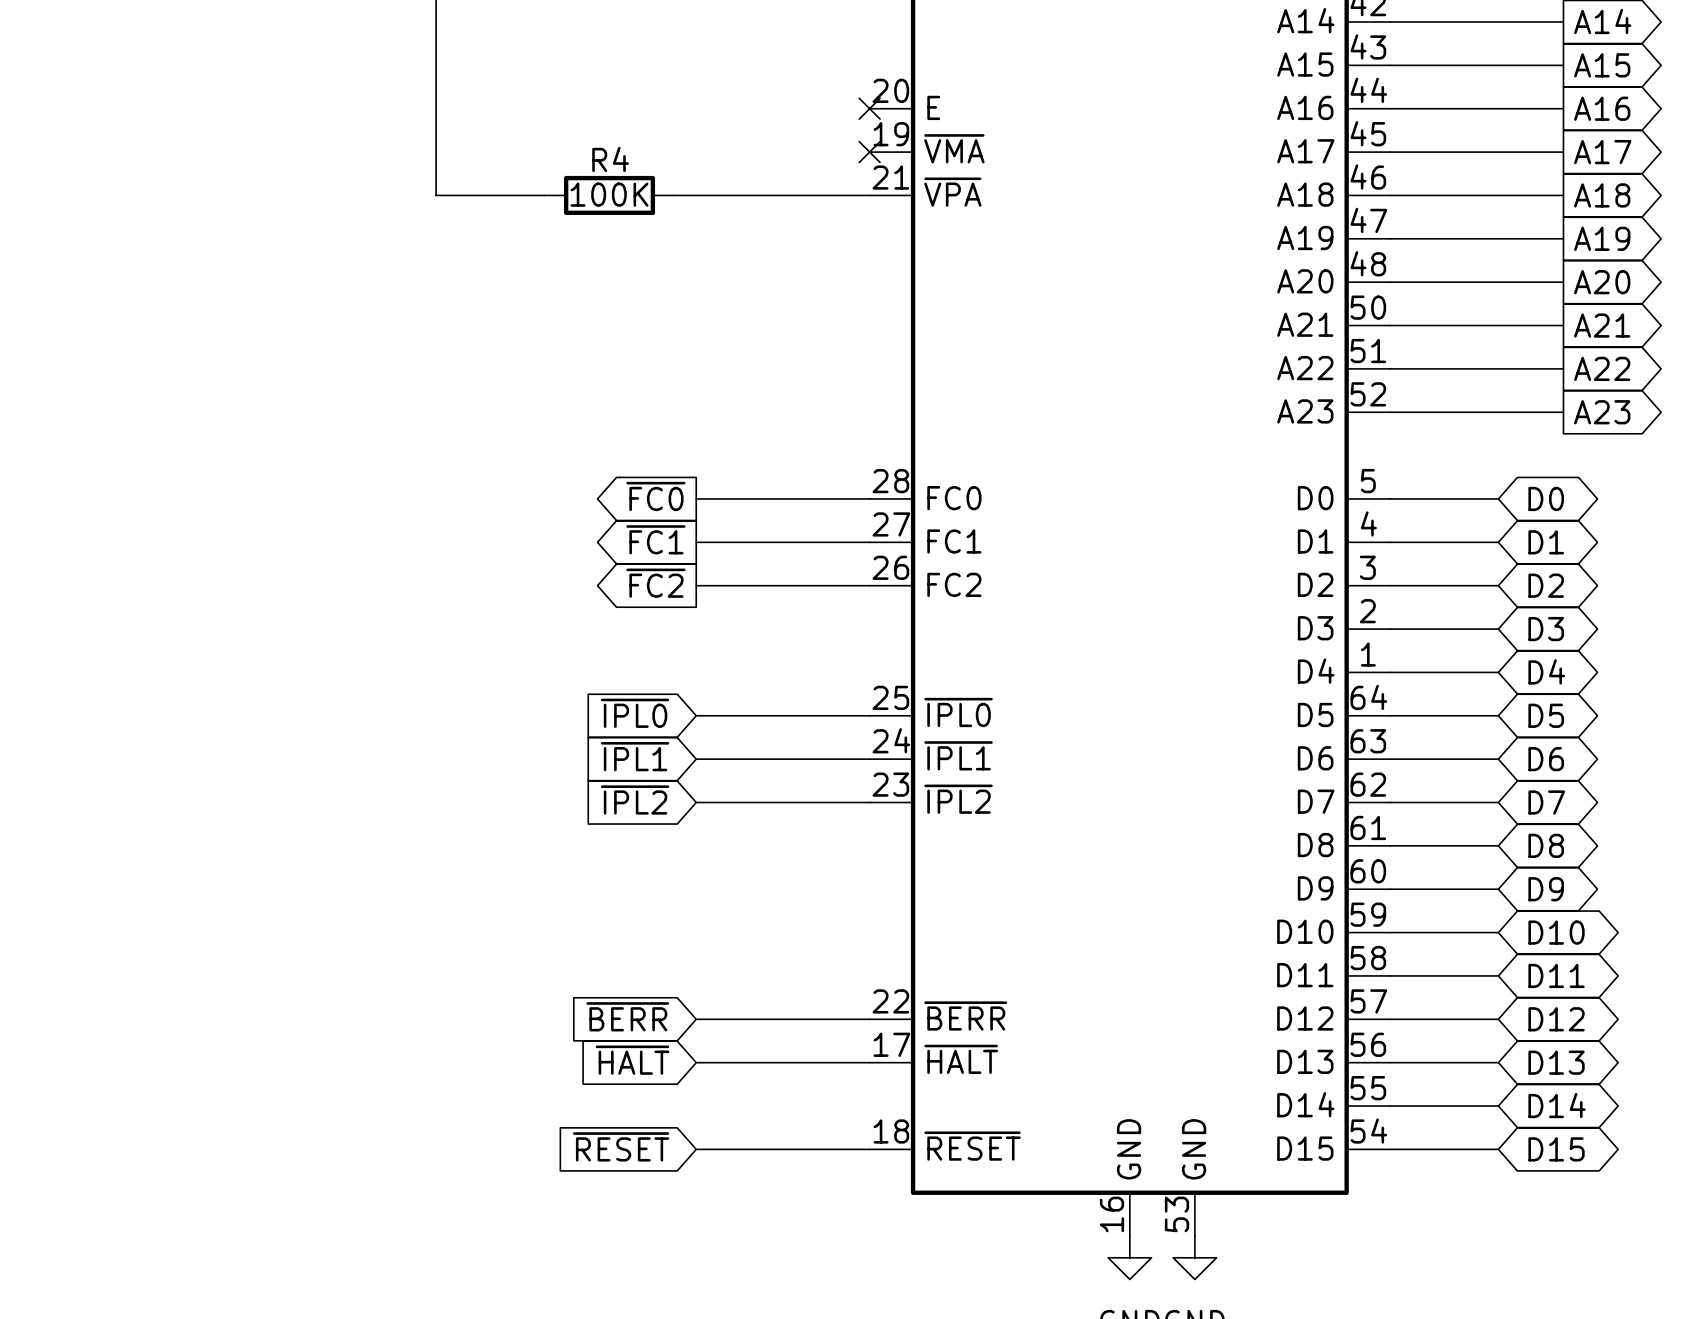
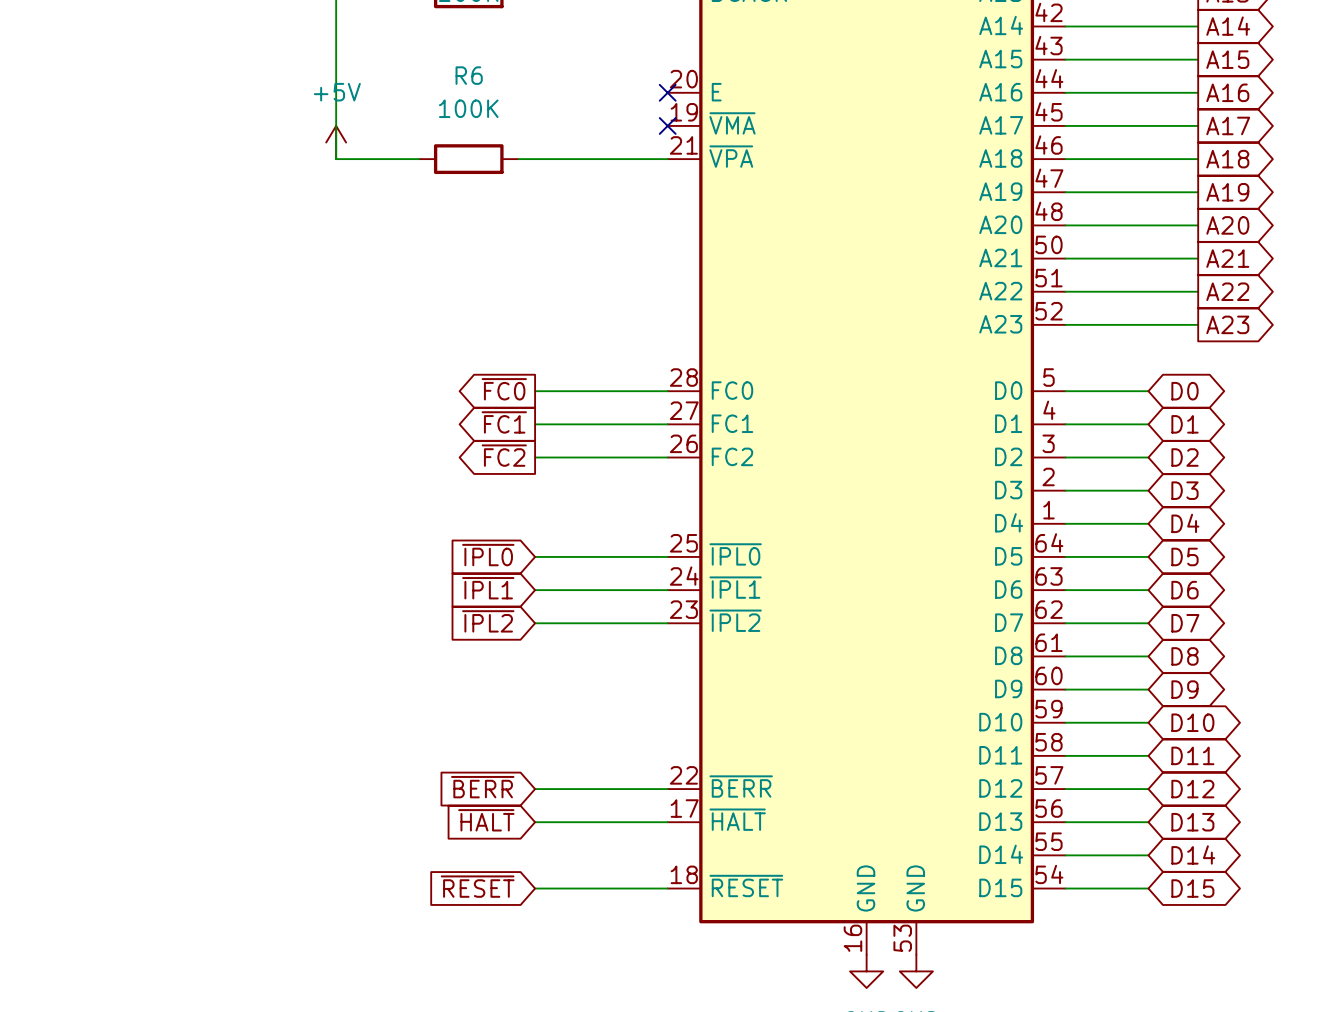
R4 name: R4 (610, 159) -> R6 (469, 75)
power symbol: none -> +5V (336, 142)
R4 value position: 100K (609, 194) -> 100K (468, 108)

